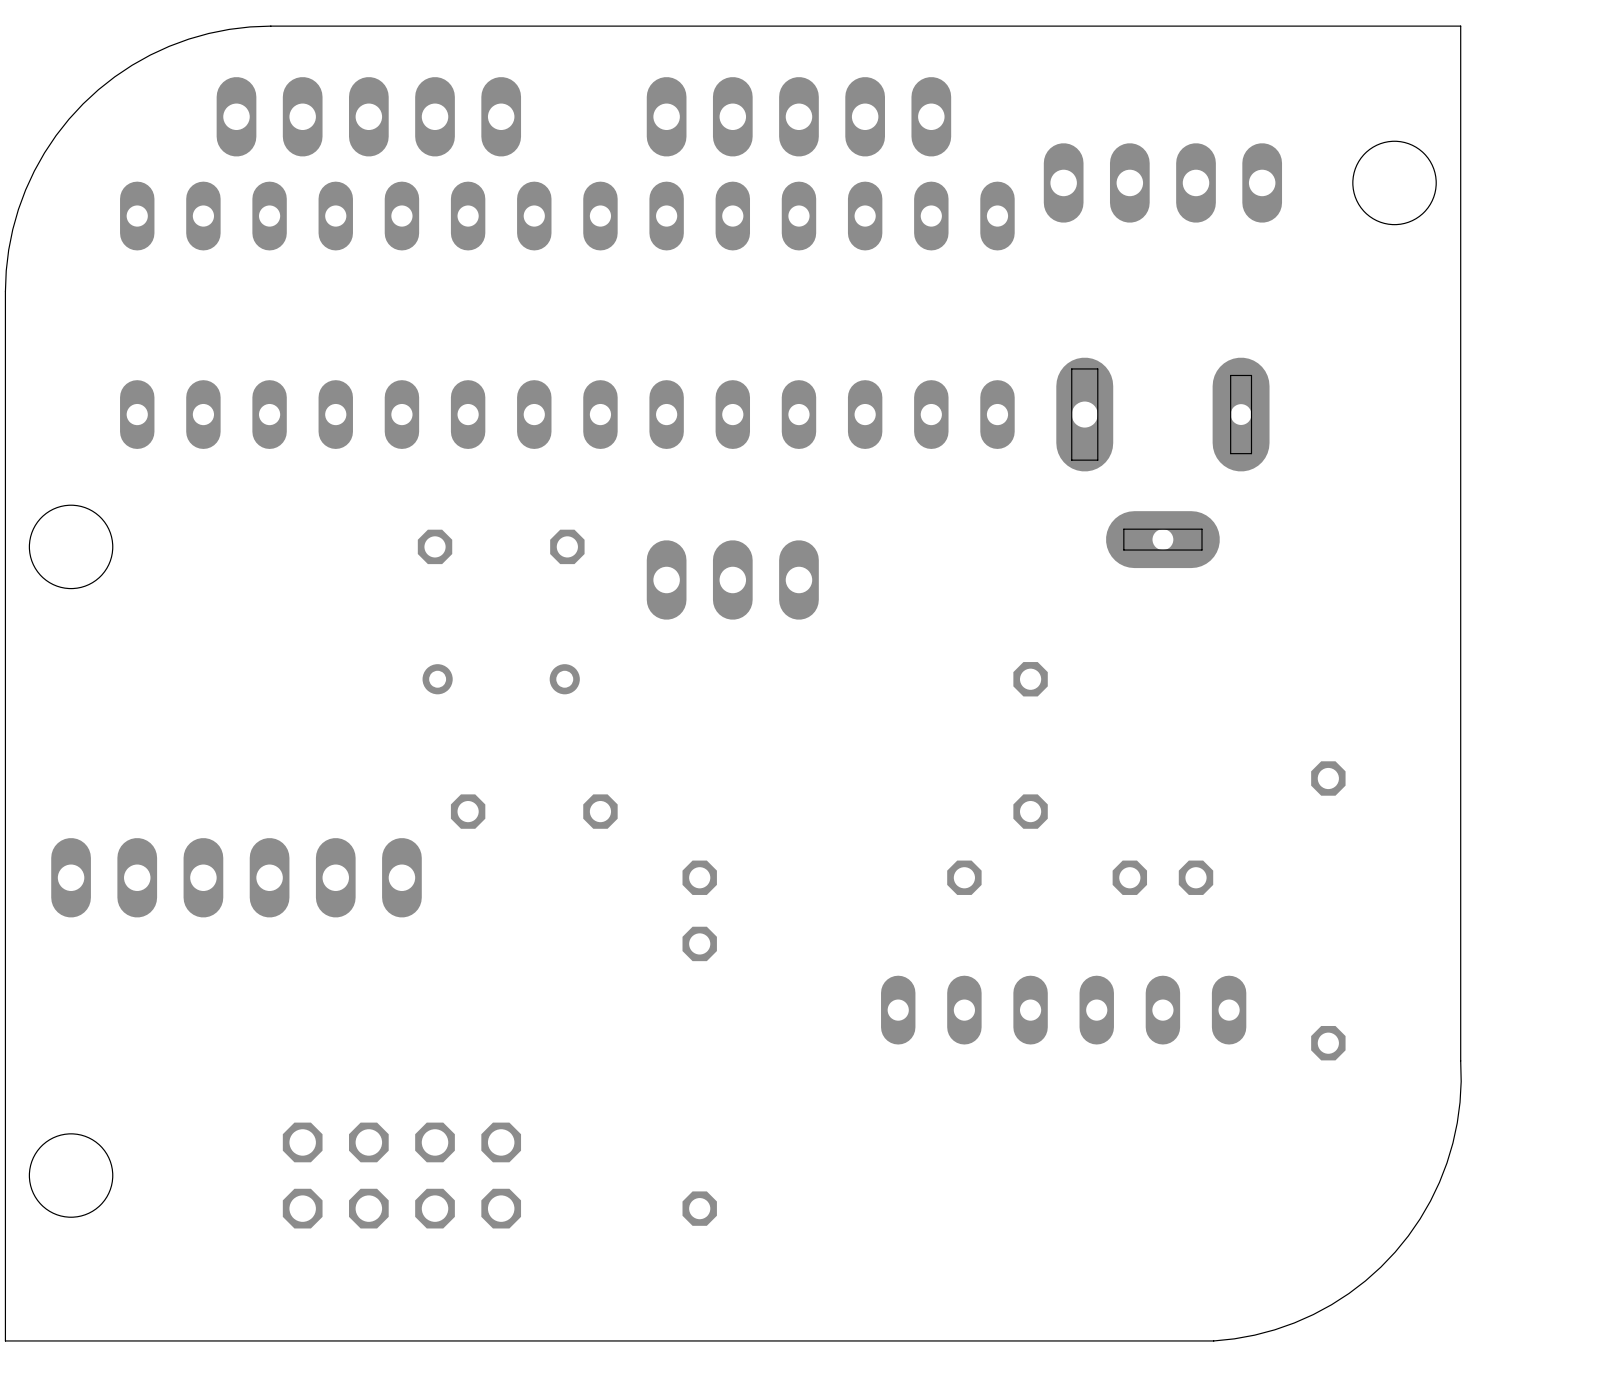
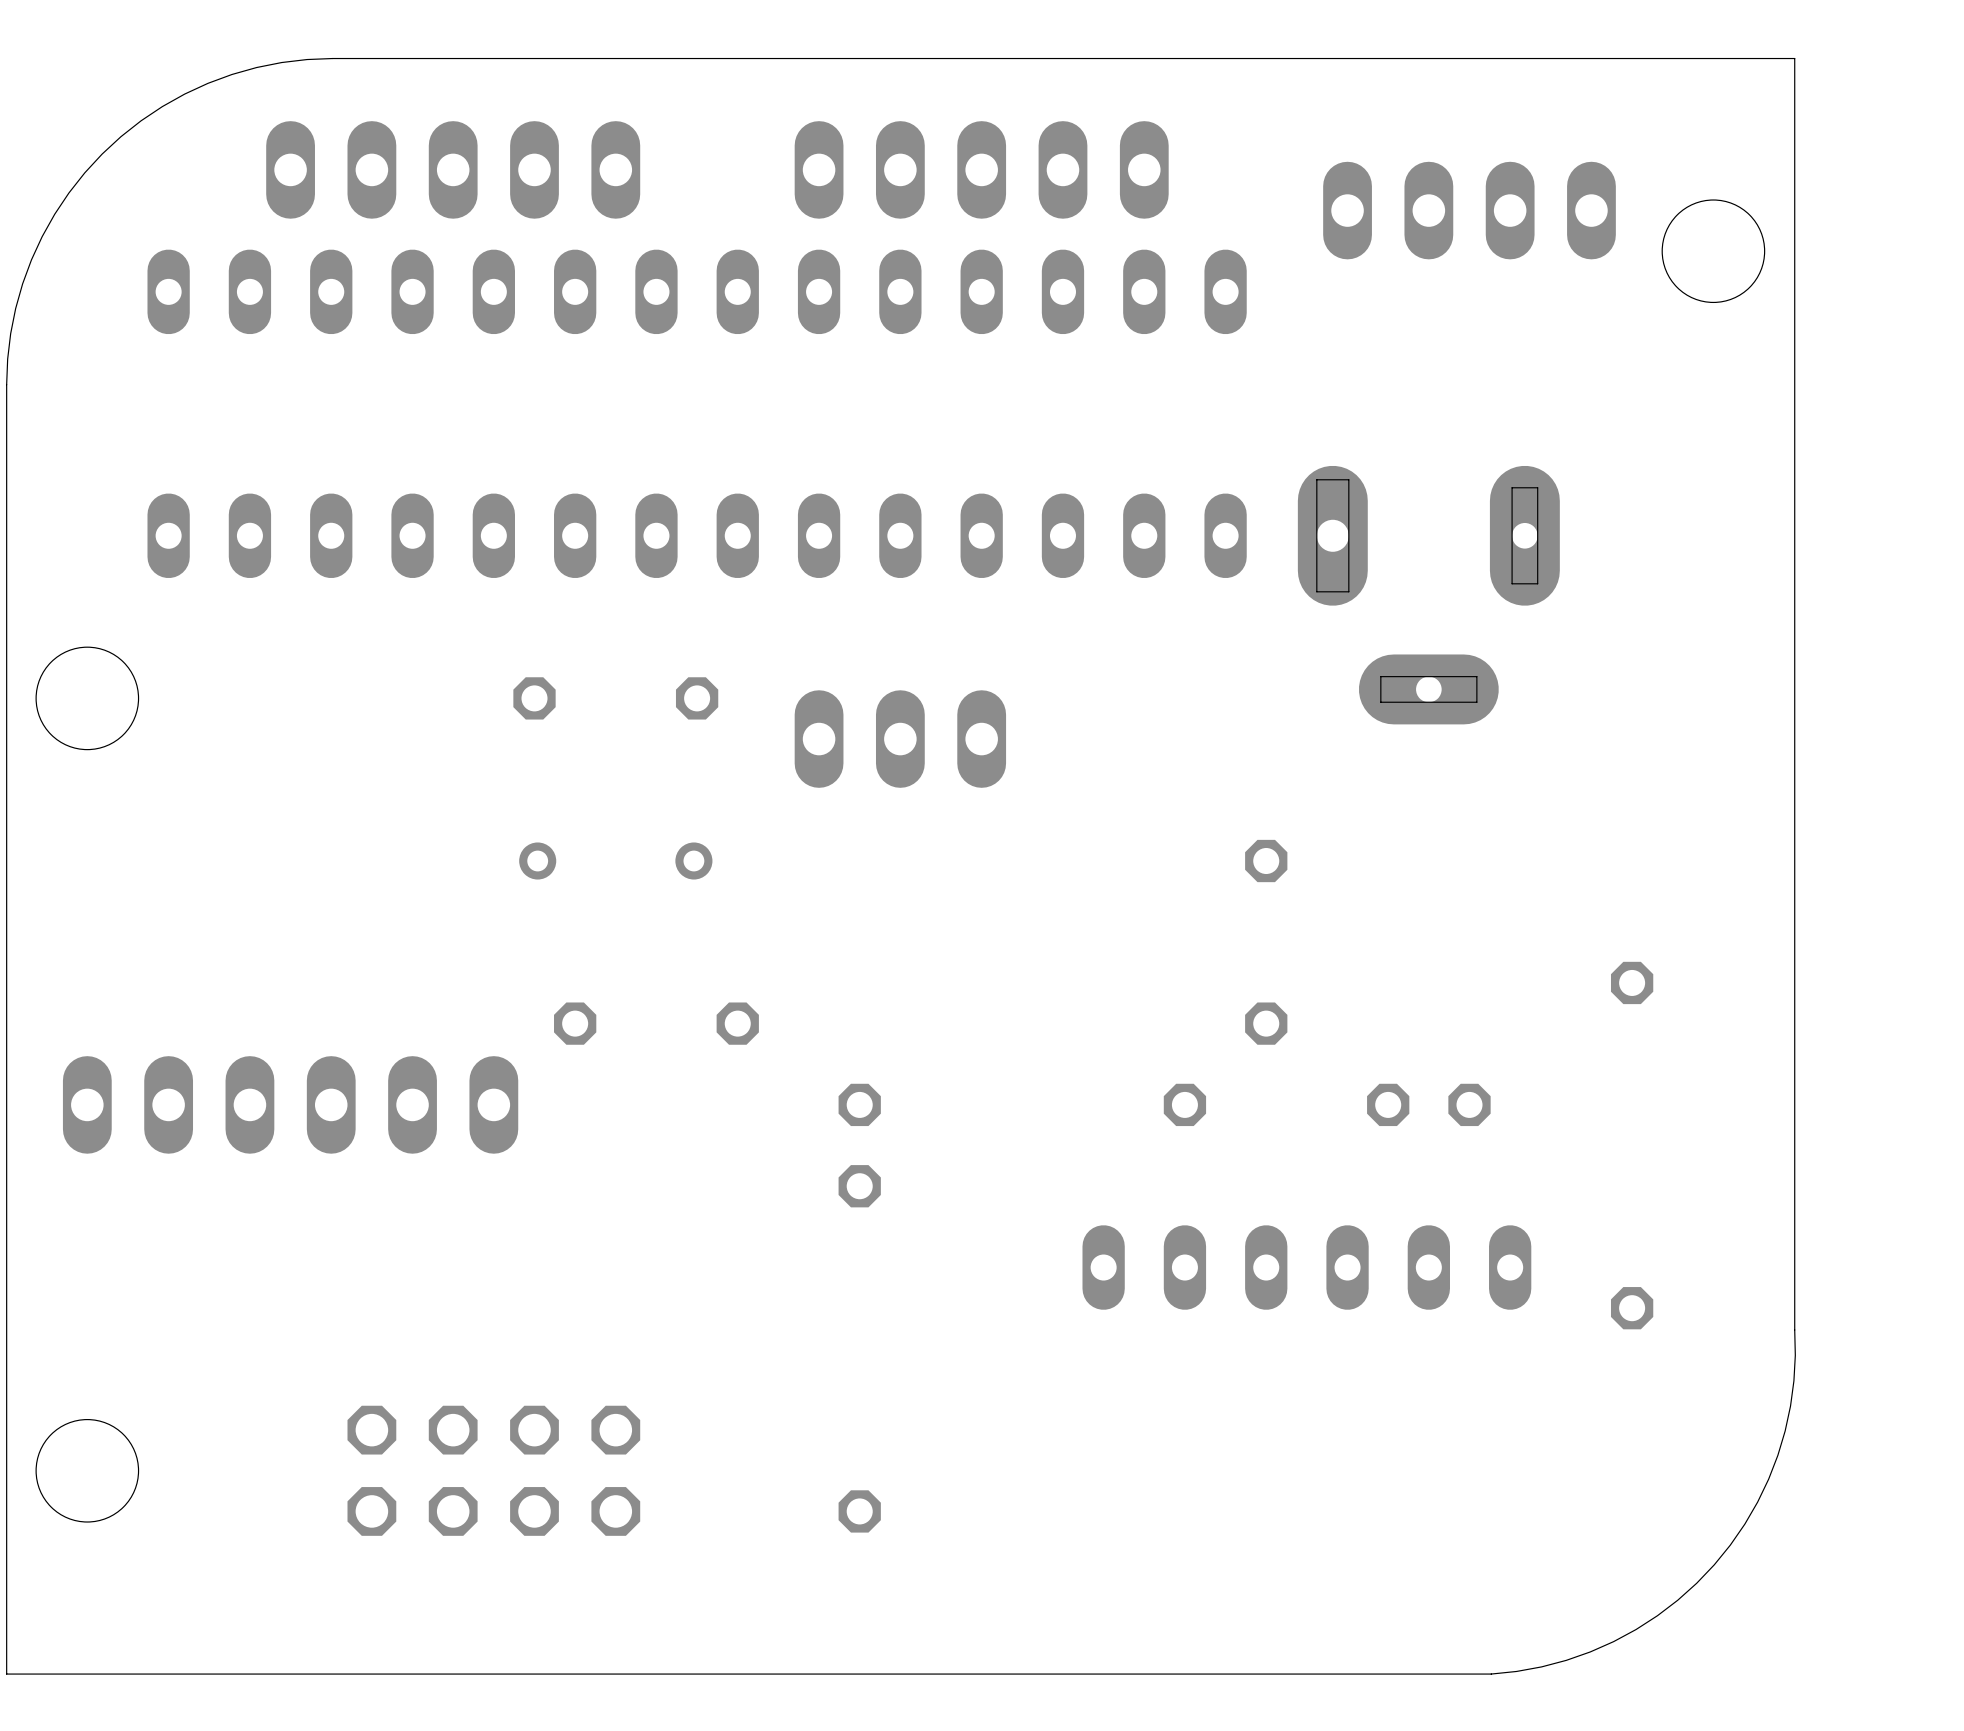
part position: (1162, 182) -> (1469, 210)

